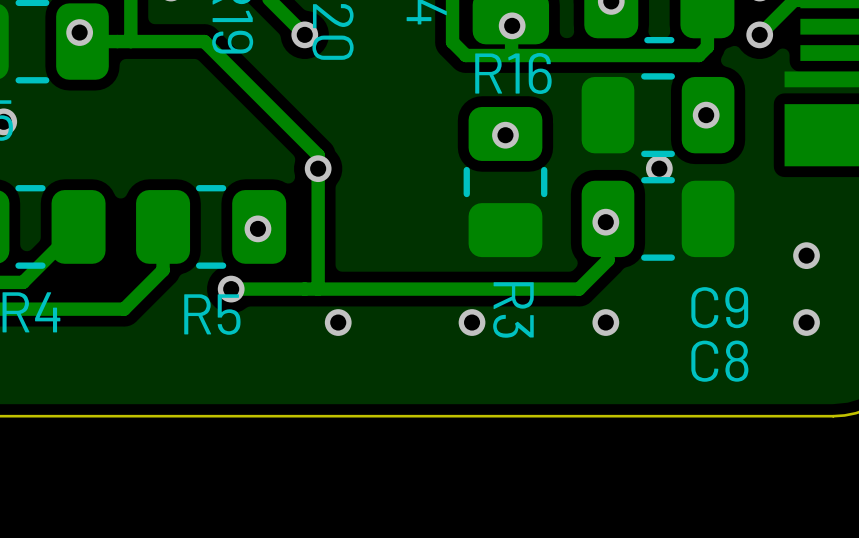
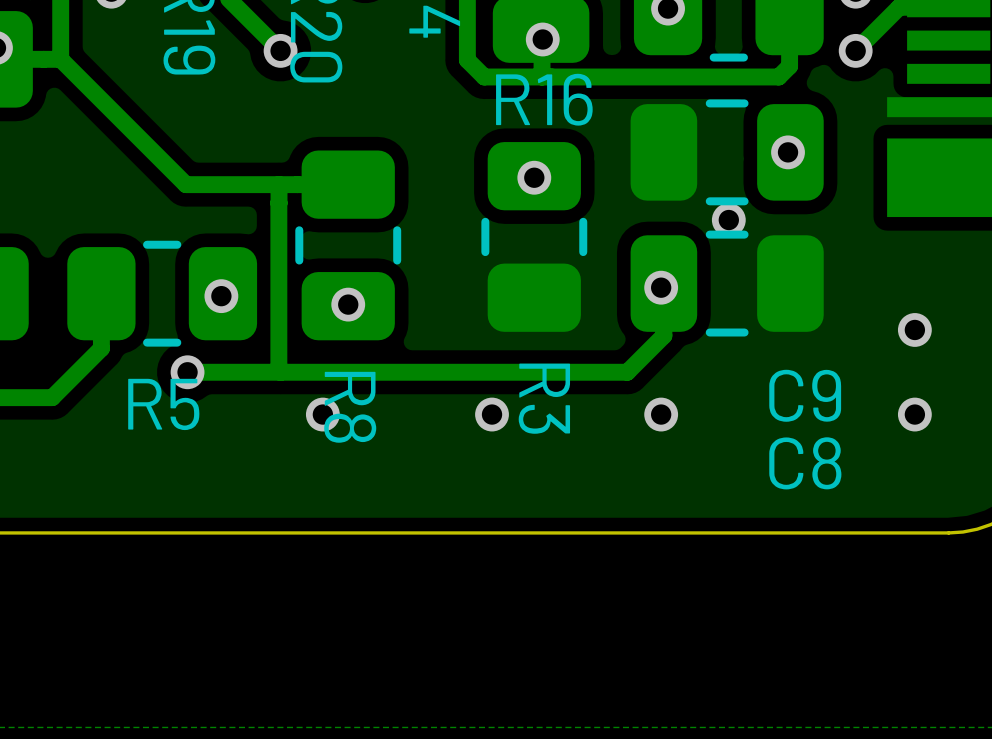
track: (130, 41) (204, 41) (318, 155) (318, 289) -> (60, 59) (185, 184) (348, 184)
via position: (318, 168) -> (348, 304)
R8: none -> (348, 245)

